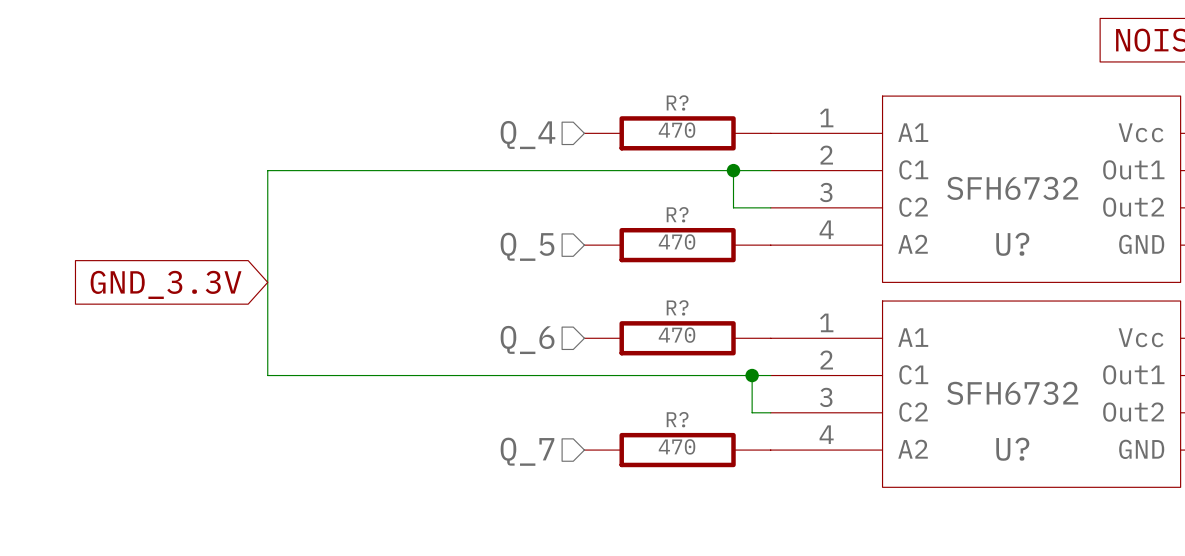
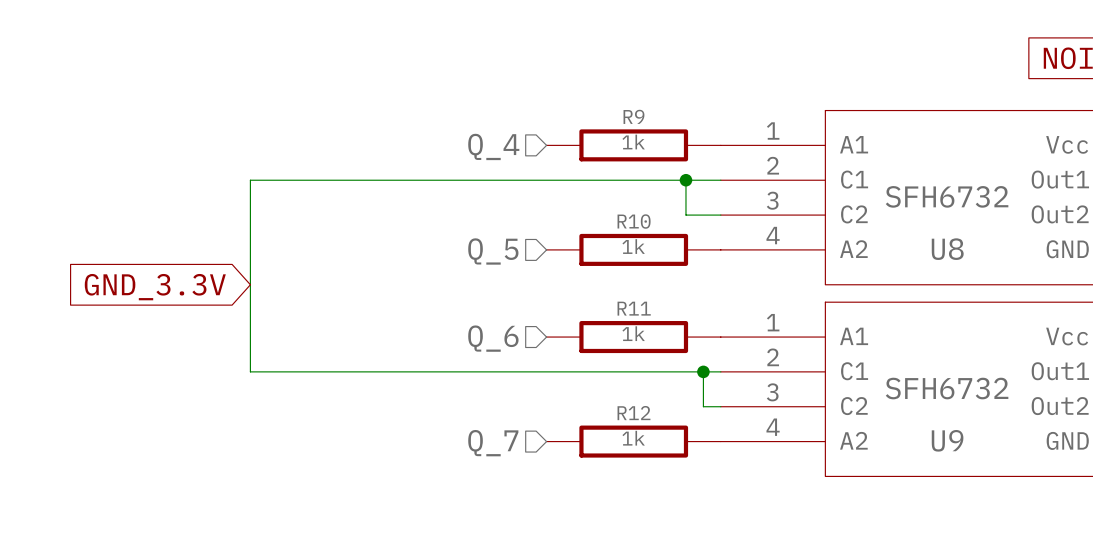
R? name: R? (677, 102) -> R9 (633, 116)
R? value: 470 (677, 130) -> 1k (633, 142)
R? name: R? (677, 214) -> R10 (634, 221)
R? value: 470 (677, 241) -> 1k (633, 246)
U? name: U? (1012, 244) -> U8 (947, 249)
R? name: R? (677, 307) -> R11 (634, 308)
R? value: 470 (677, 335) -> 1k (633, 333)
R? name: R? (677, 419) -> R12 (633, 413)
R? value: 470 (677, 446) -> 1k (633, 438)
U? name: U? (1012, 449) -> U9 (947, 440)

